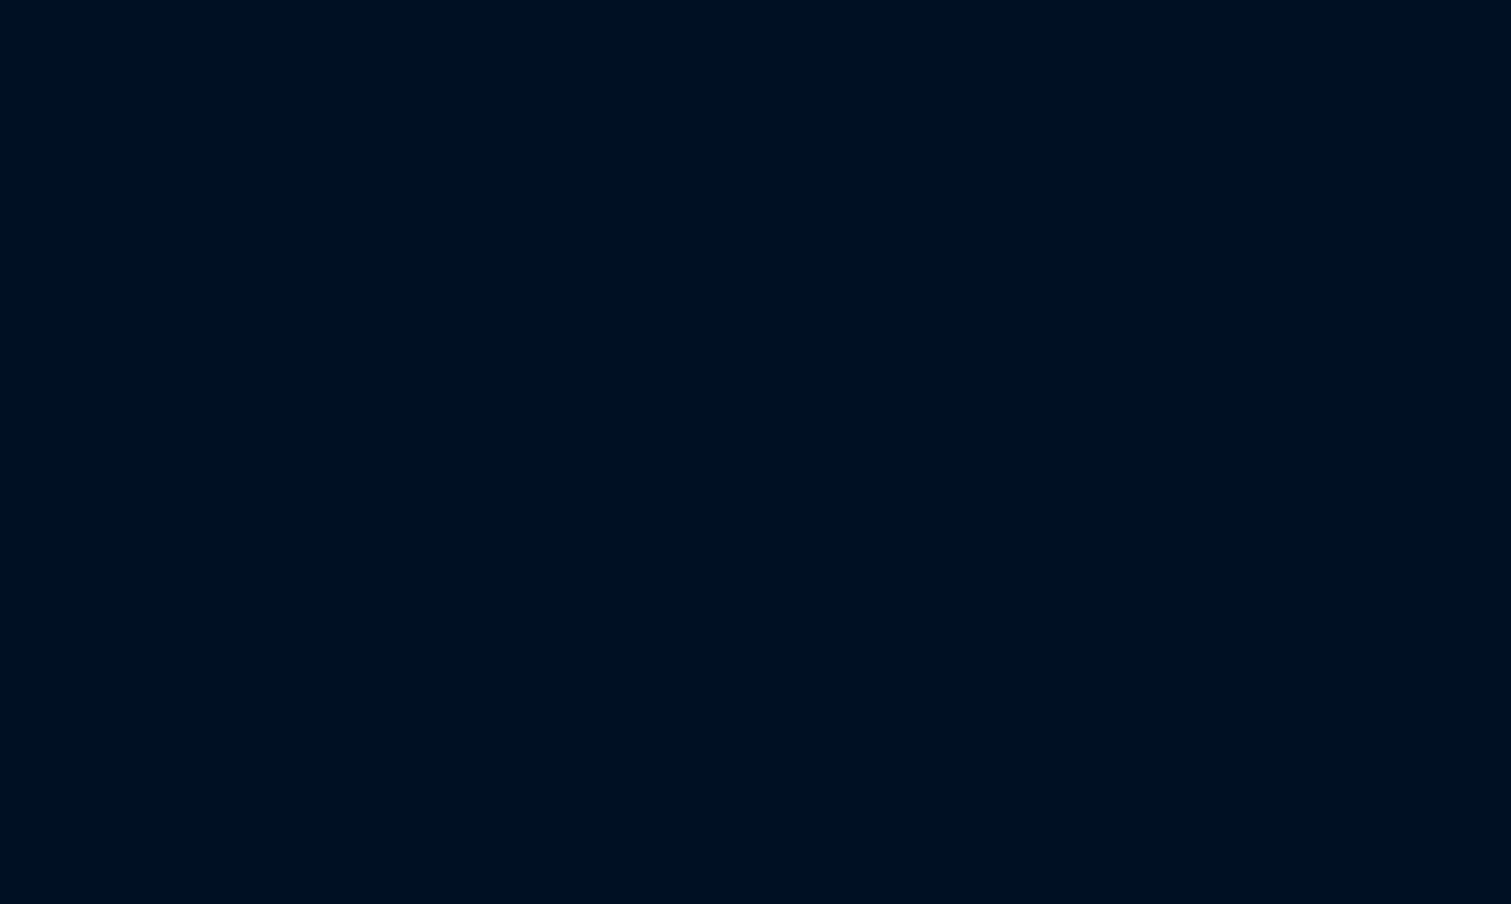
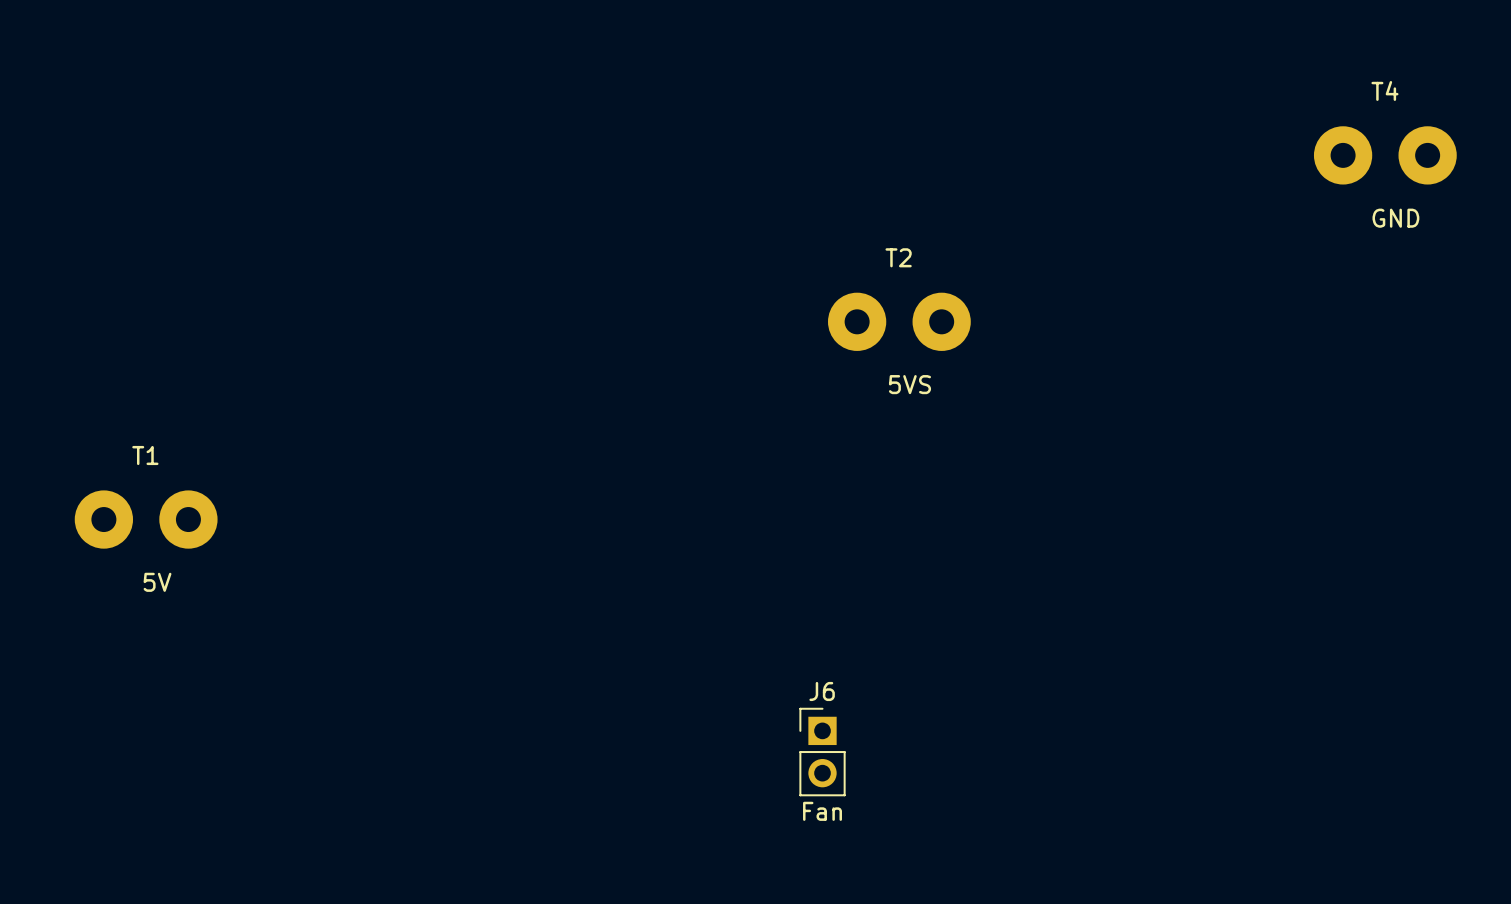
T4: none -> GND (1385, 155)
T2: none -> 5VS (899, 321)
T1: none -> 5V (146, 519)
J6: none -> Fan (822, 752)

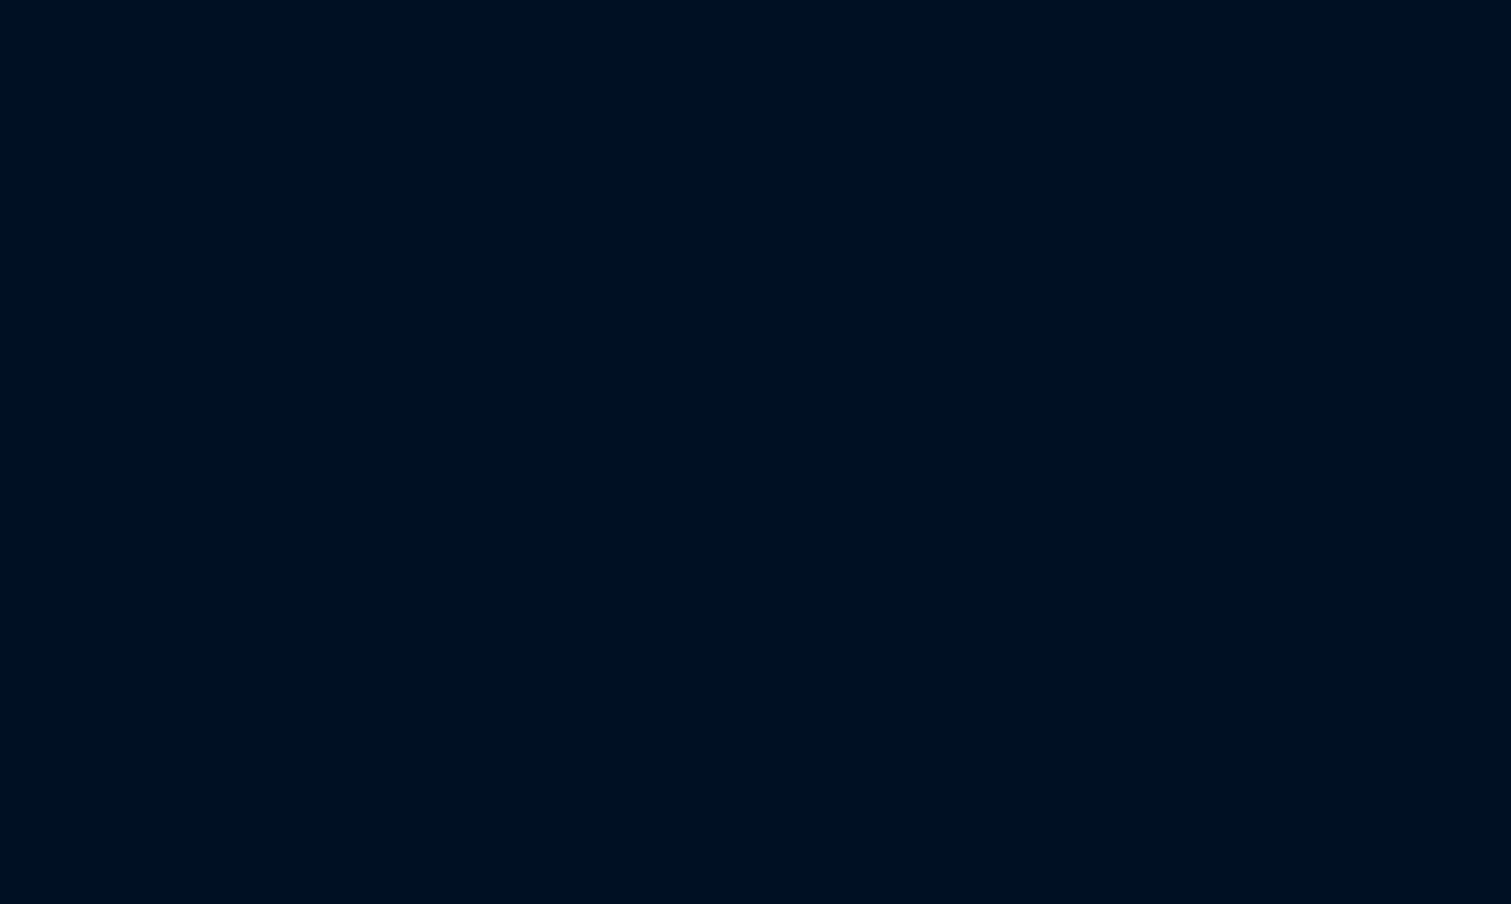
T4: GND (1385, 155) -> none
T2: 5VS (899, 321) -> none
T1: 5V (146, 519) -> none
J6: Fan (822, 752) -> none

